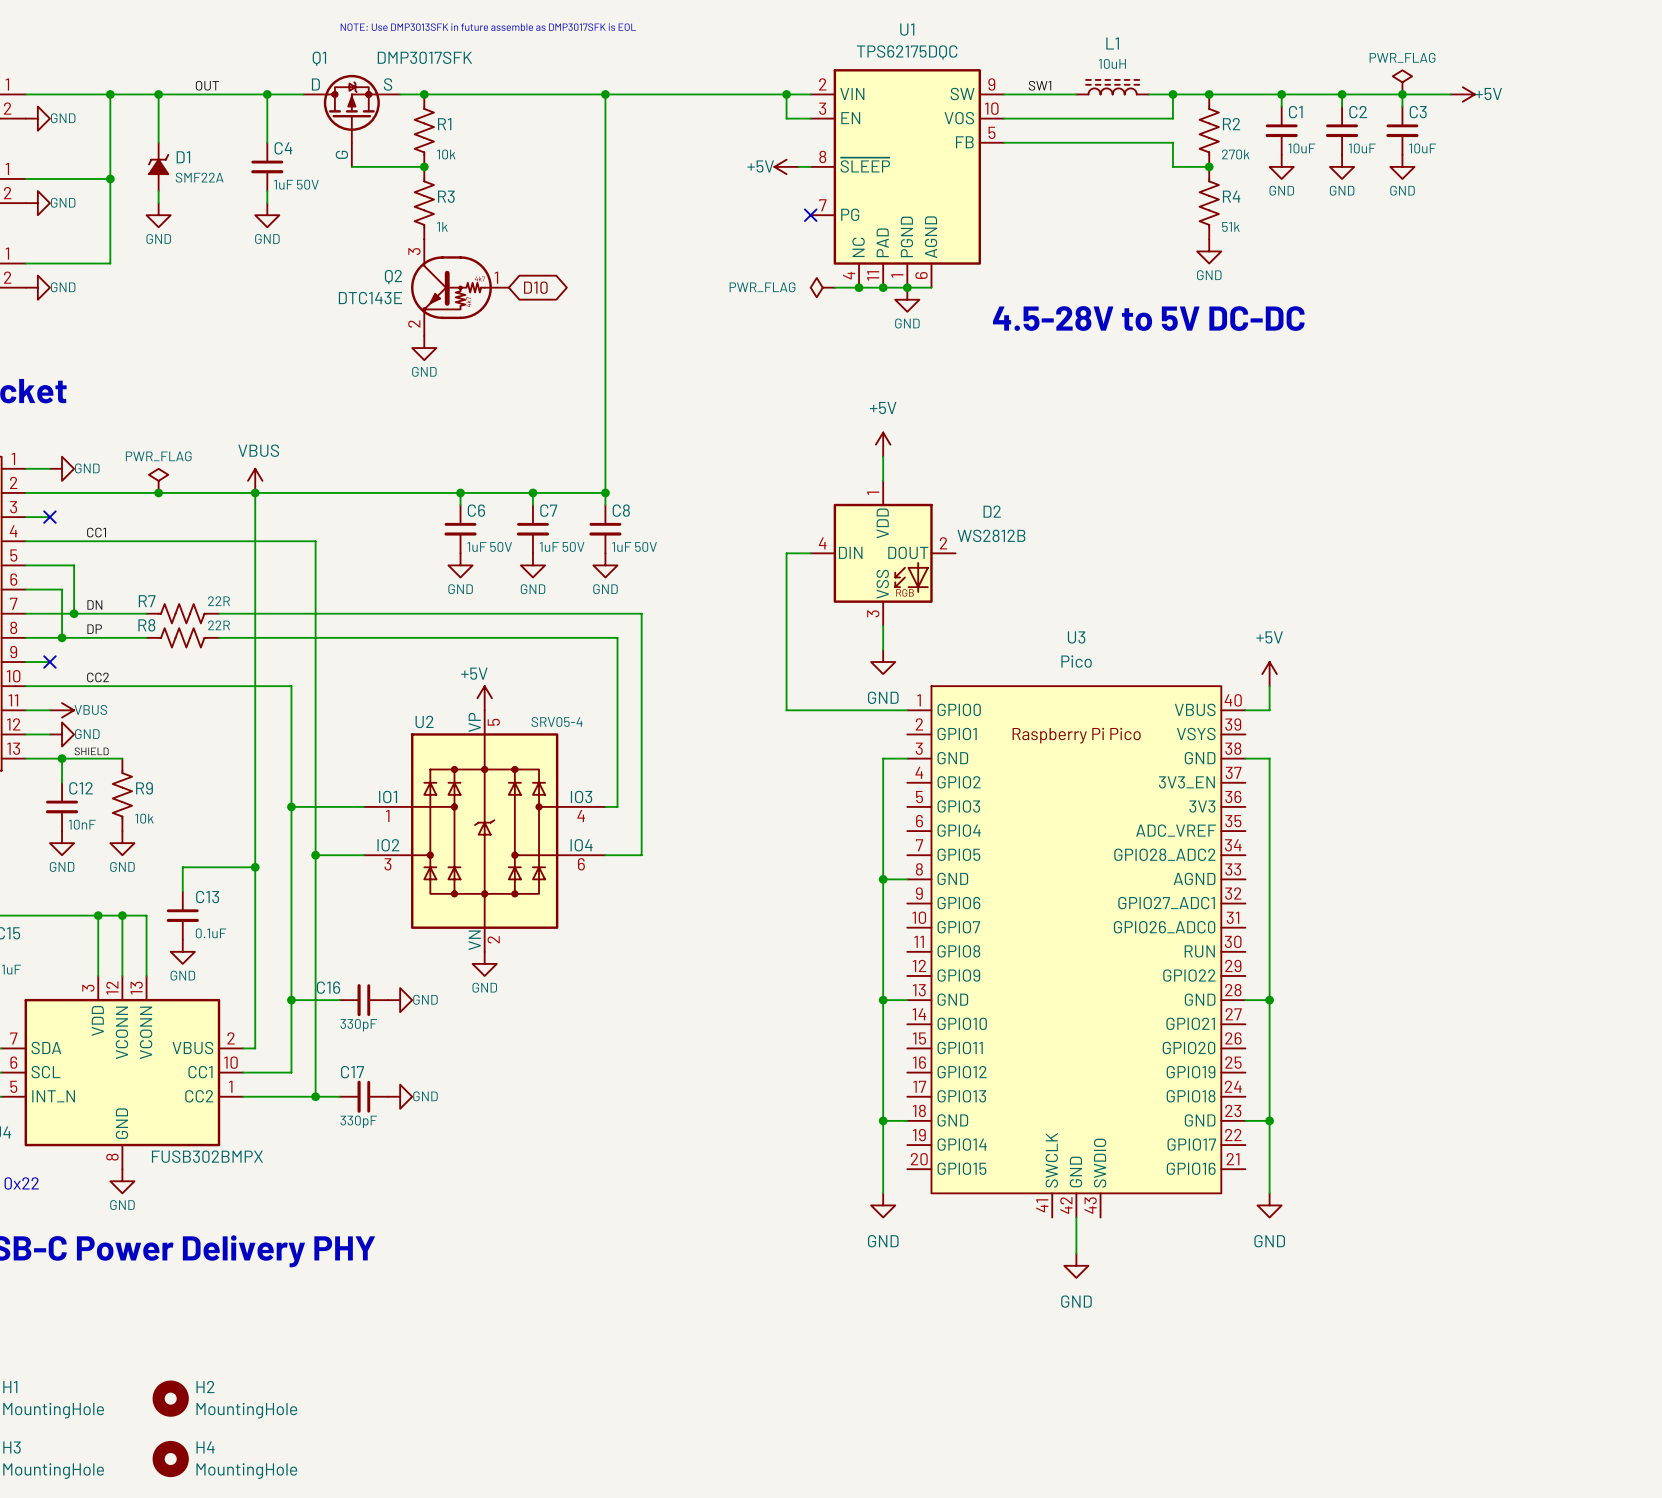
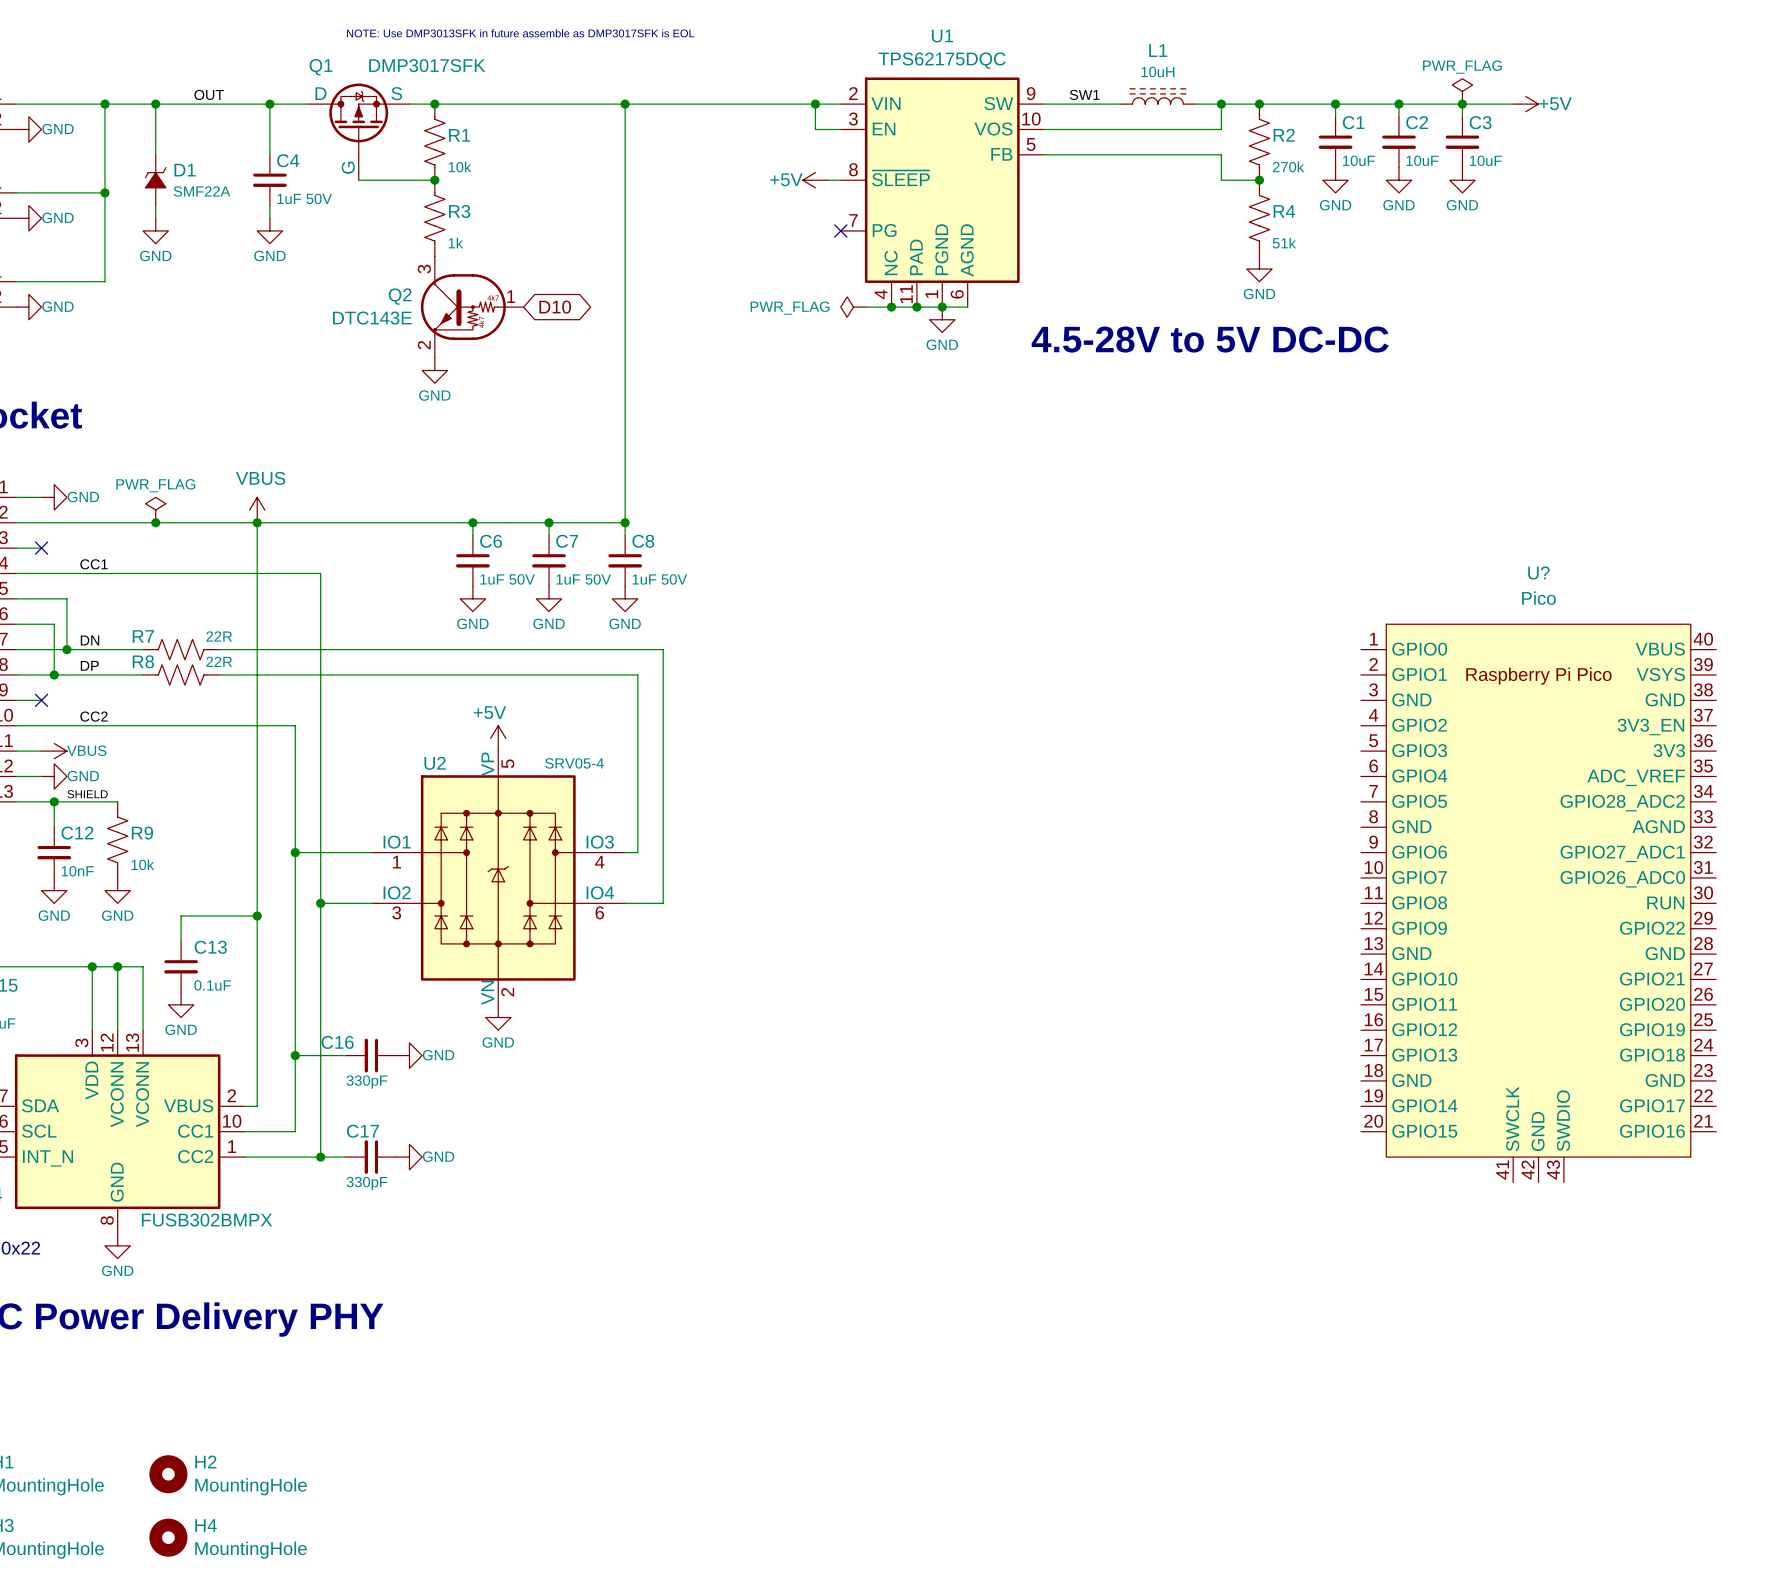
power symbol: +5V (883, 444) -> none
wire: (883, 456) (883, 480) -> none
wire: (810, 553) (786, 553) (786, 710) (907, 710) -> none
D2: WS2812B (883, 553) -> none
wire: (883, 625) (883, 649) -> none
power symbol: GND (883, 662) -> none
power symbol: +5V (1269, 674) -> none
wire: (1269, 686) (1269, 710) (1245, 710) -> none
wire: (907, 758) (883, 758) (883, 1193) -> none
wire: (1245, 758) (1269, 758) (1269, 1193) -> none
U?: none -> Pico (1538, 903)
wire: (883, 879) (907, 879) -> none
junction: (883, 879) -> none
U3: Pico (1076, 951) -> none
wire: (883, 1000) (907, 1000) -> none
junction: (883, 1000) -> none
wire: (1245, 1000) (1269, 1000) -> none
junction: (1269, 1000) -> none
wire: (883, 1120) (907, 1120) -> none
junction: (883, 1120) -> none
wire: (1245, 1120) (1269, 1120) -> none
junction: (1269, 1120) -> none
power symbol: GND (883, 1205) -> none
power symbol: GND (1269, 1205) -> none
wire: (1076, 1217) (1076, 1253) -> none
power symbol: GND (1076, 1265) -> none

